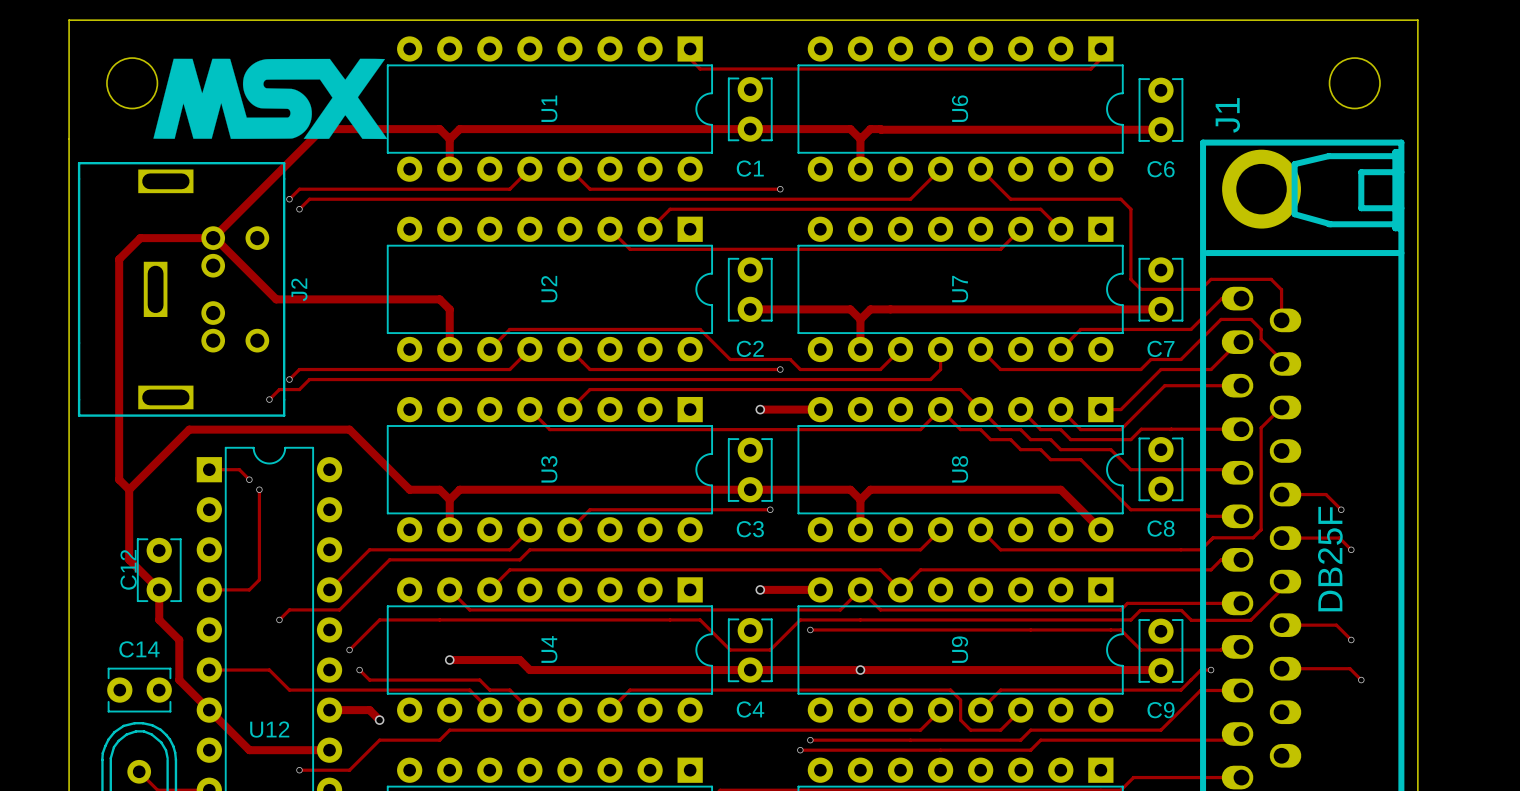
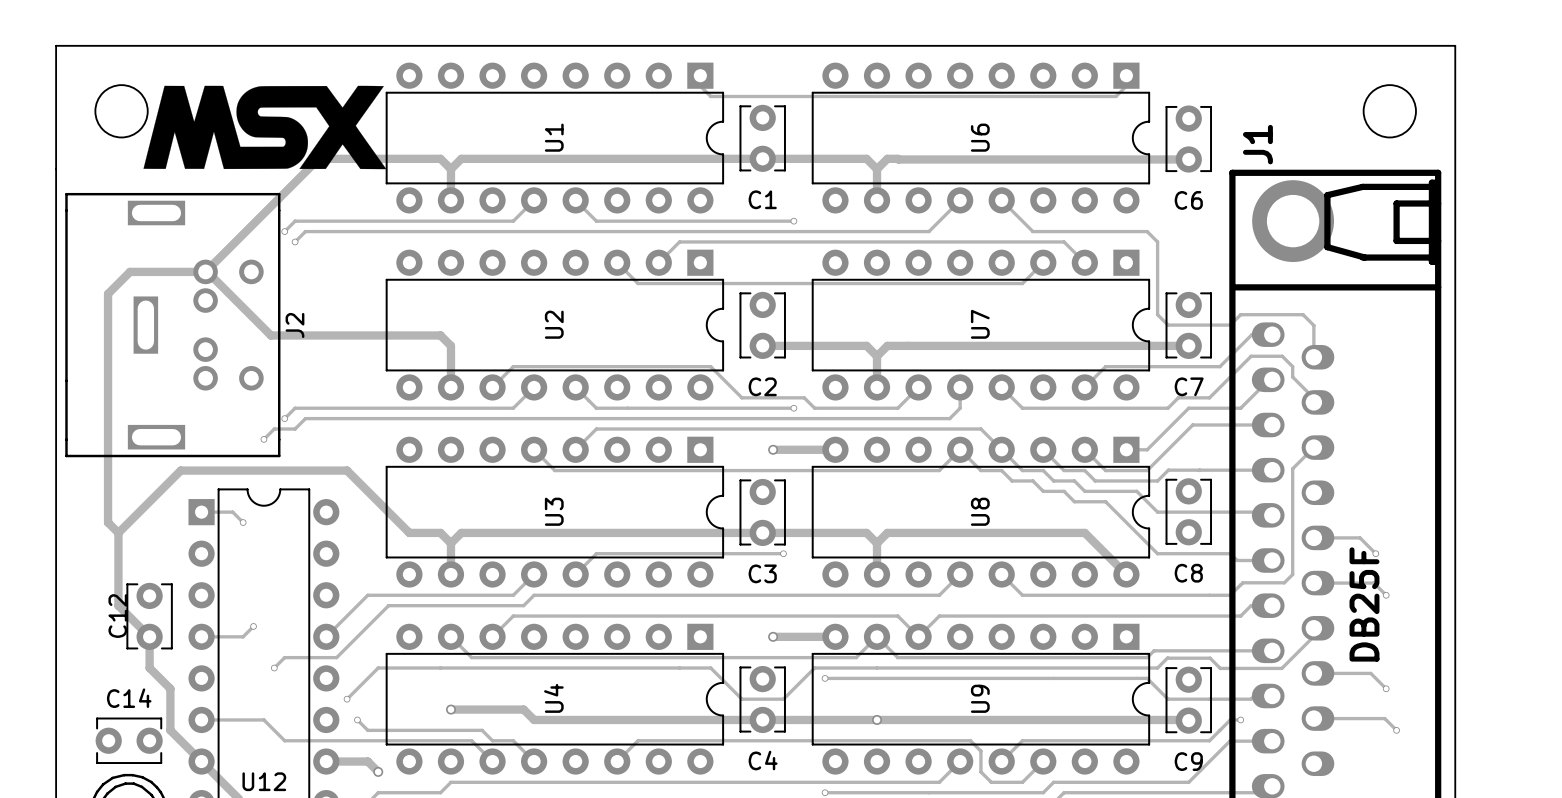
track: (259, 489) (259, 579) -> none
via position: (259, 489) -> (253, 626)

